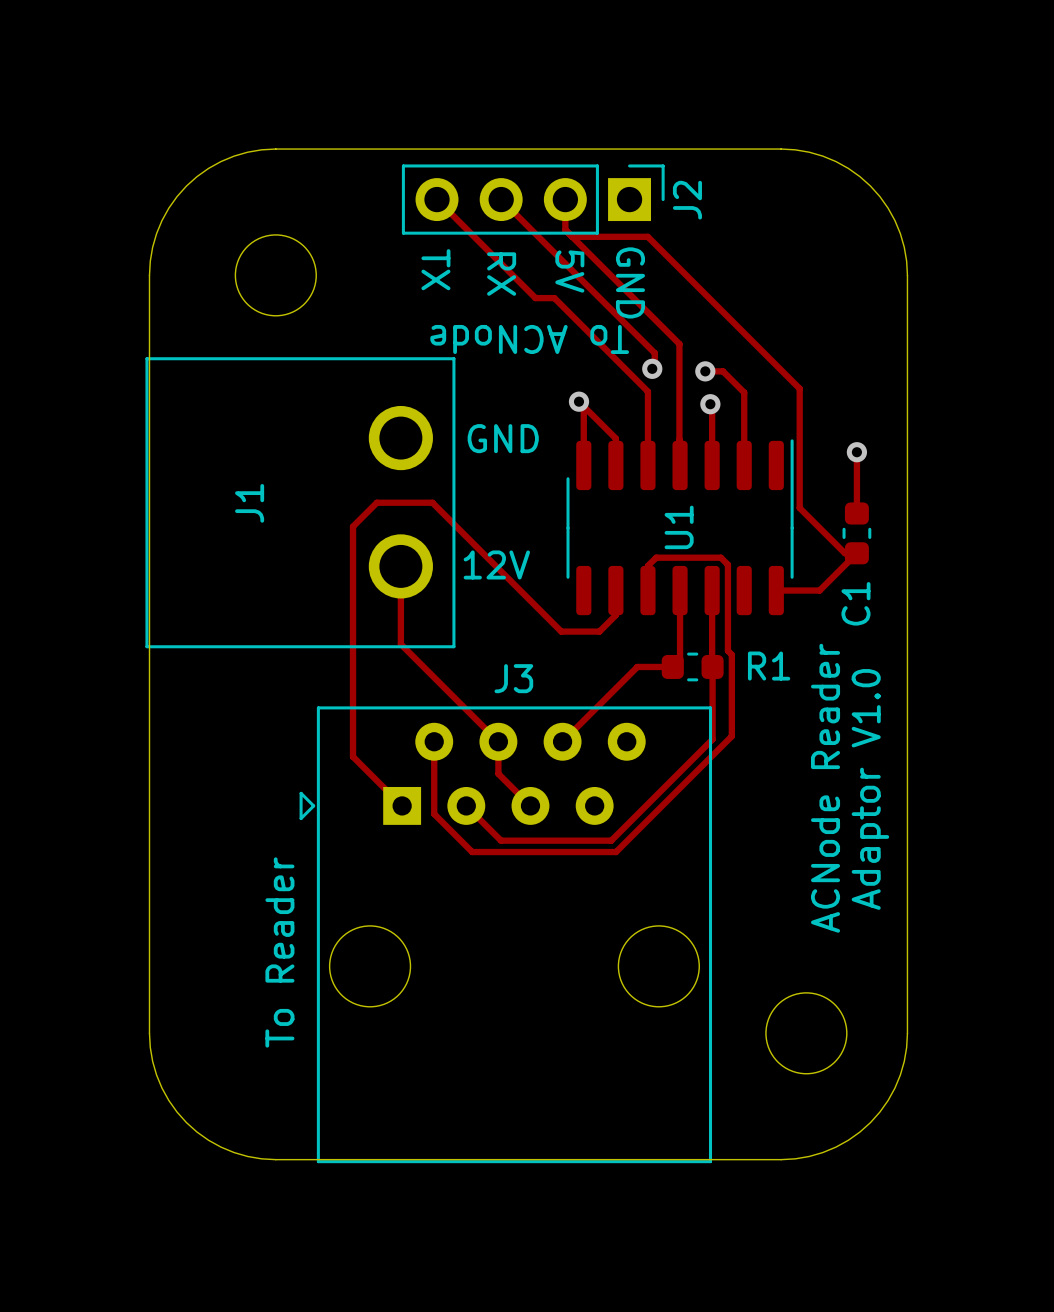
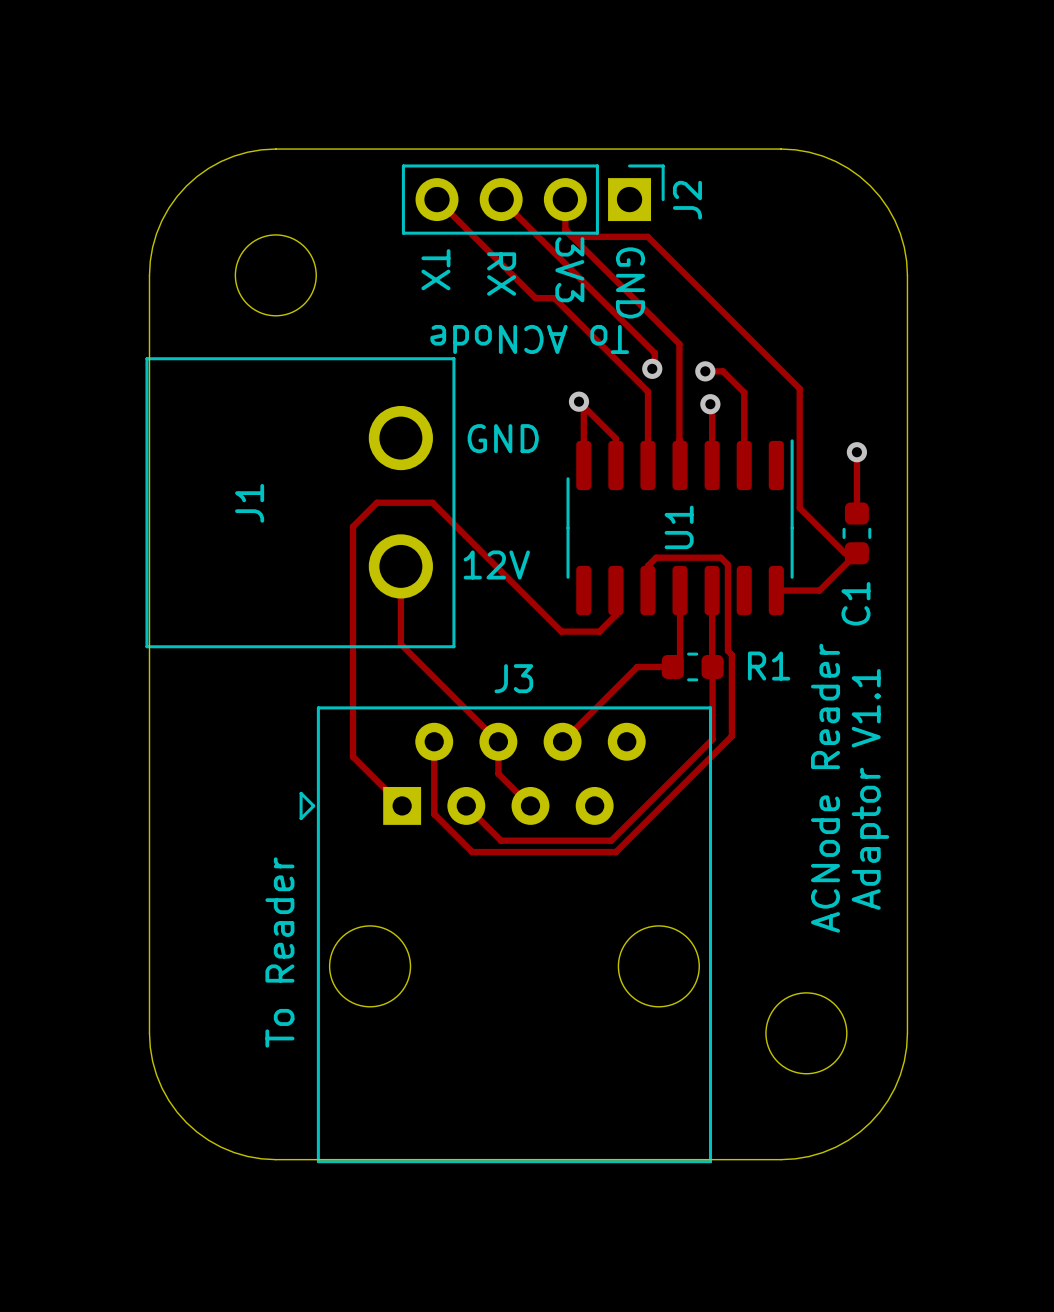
text: 5V (569, 271) -> 3V3 (569, 269)
text: Adaptor V1.0 (870, 789) -> Adaptor V1.1 (870, 789)

